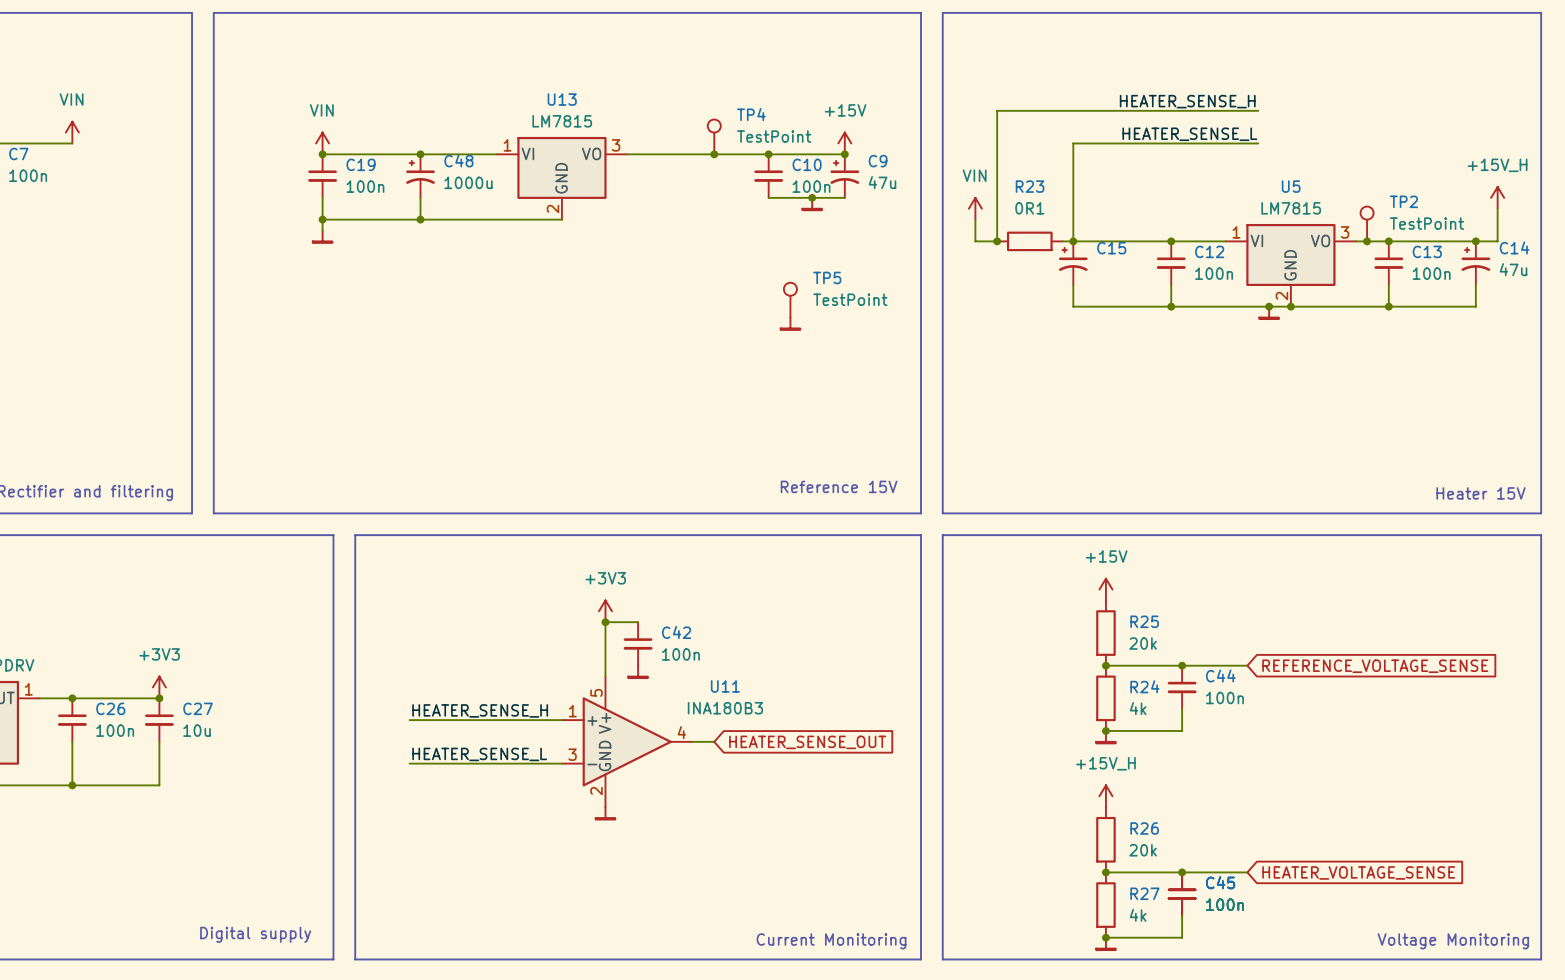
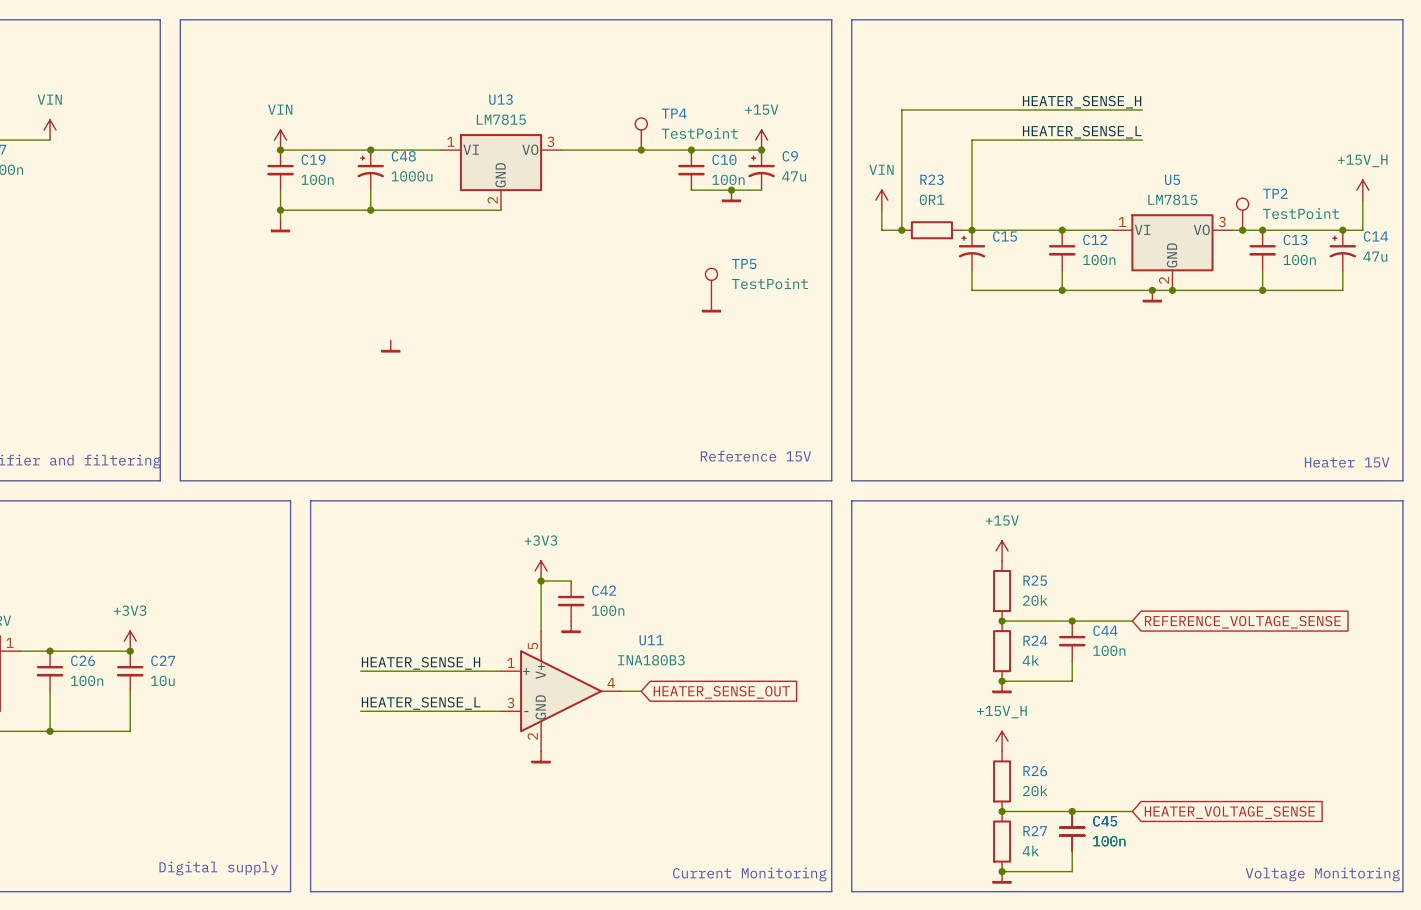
power symbol: none -> (390, 346)

